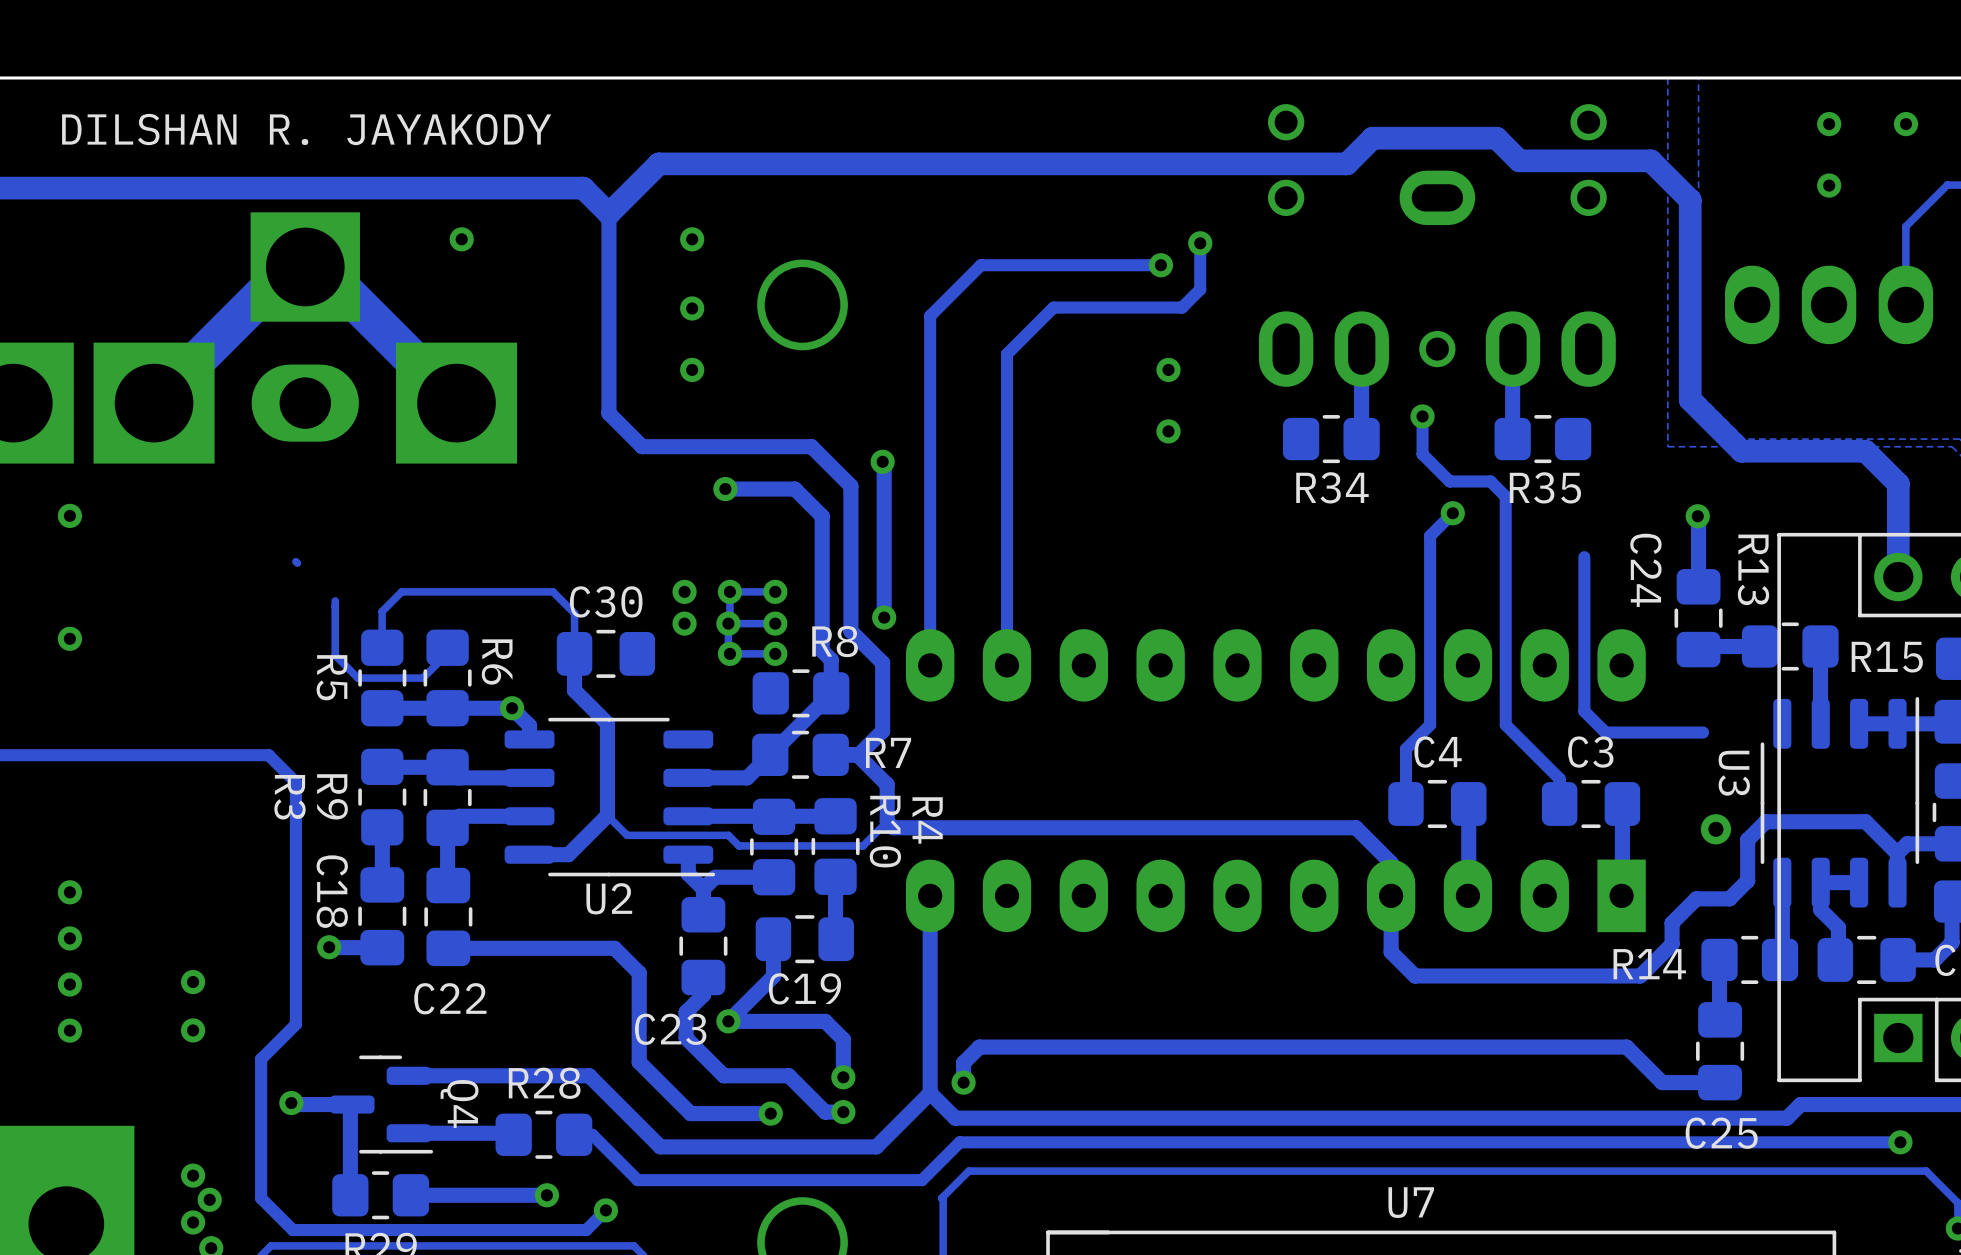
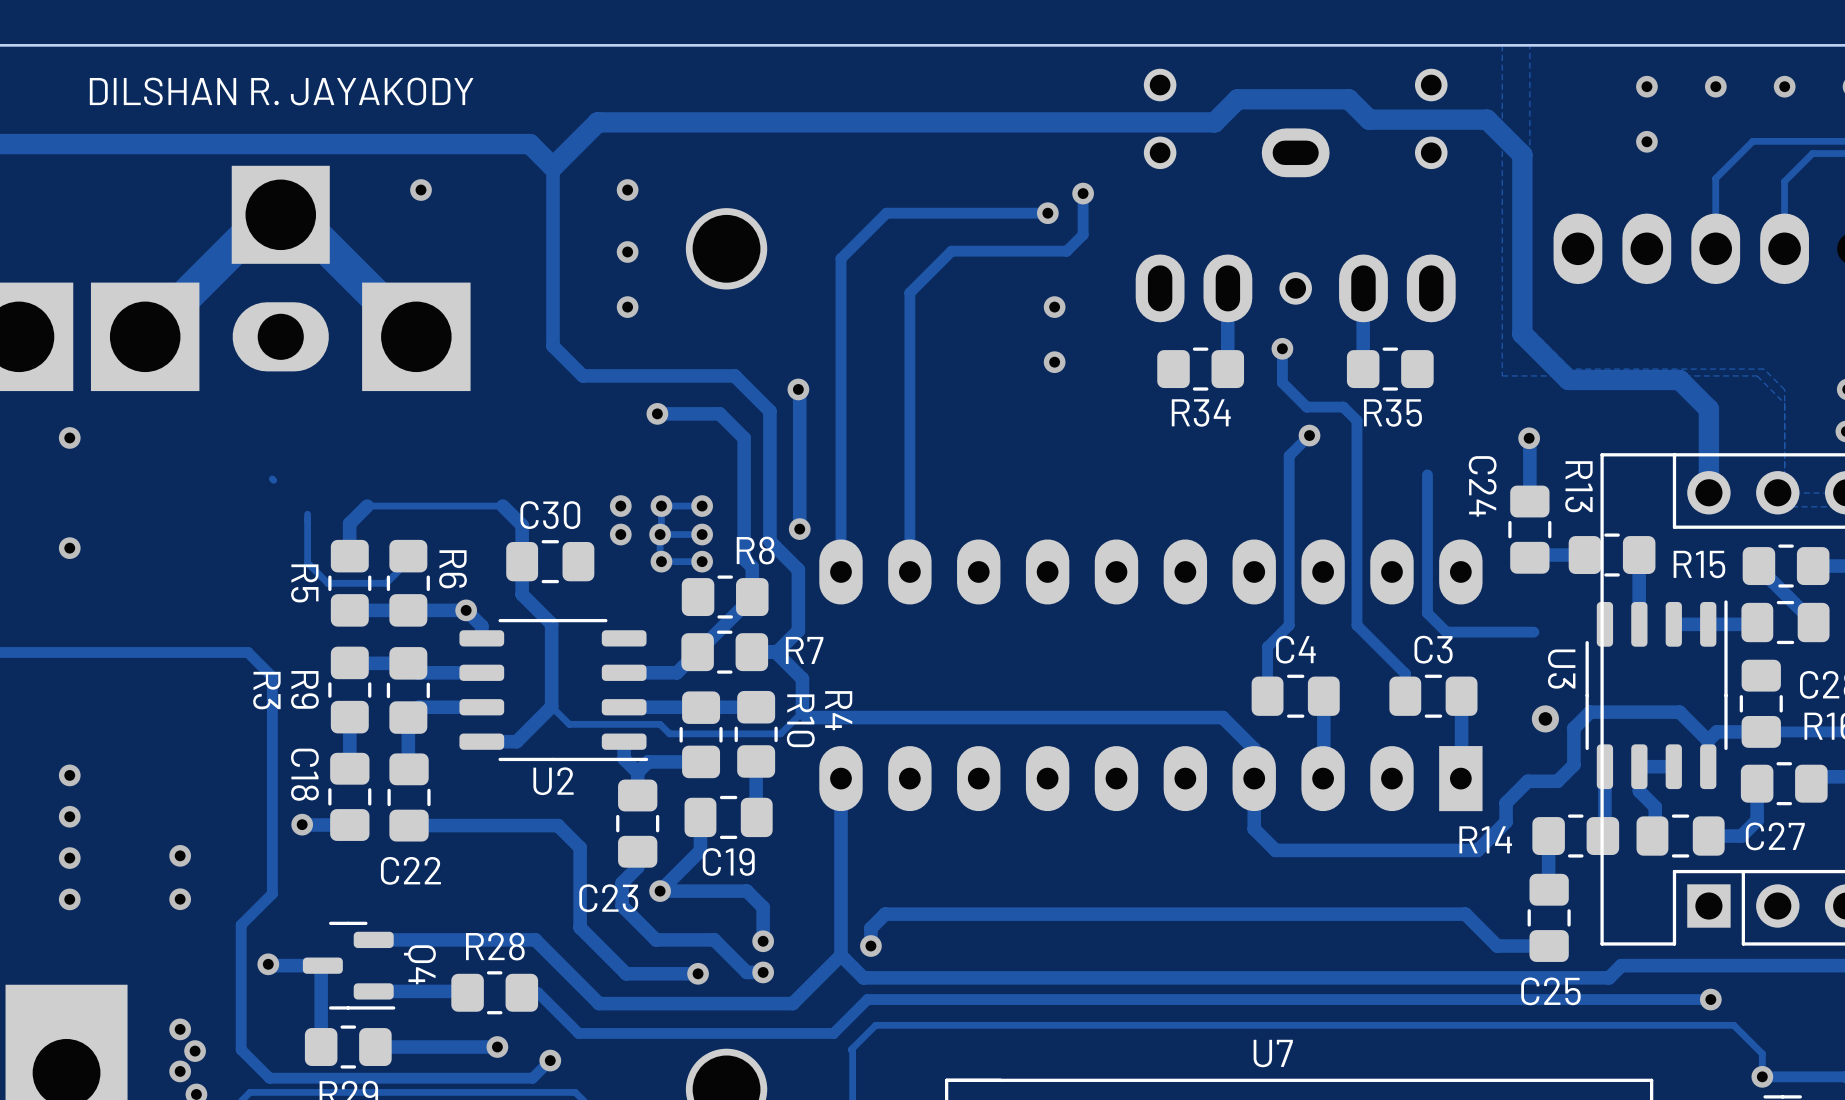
track width: thin (401, 591) (382, 611) (382, 647) -> thick (367, 506) (349, 523) (349, 555)
track width: thin (552, 591) (574, 613) (574, 653) -> thick (502, 506) (522, 525) (522, 561)

